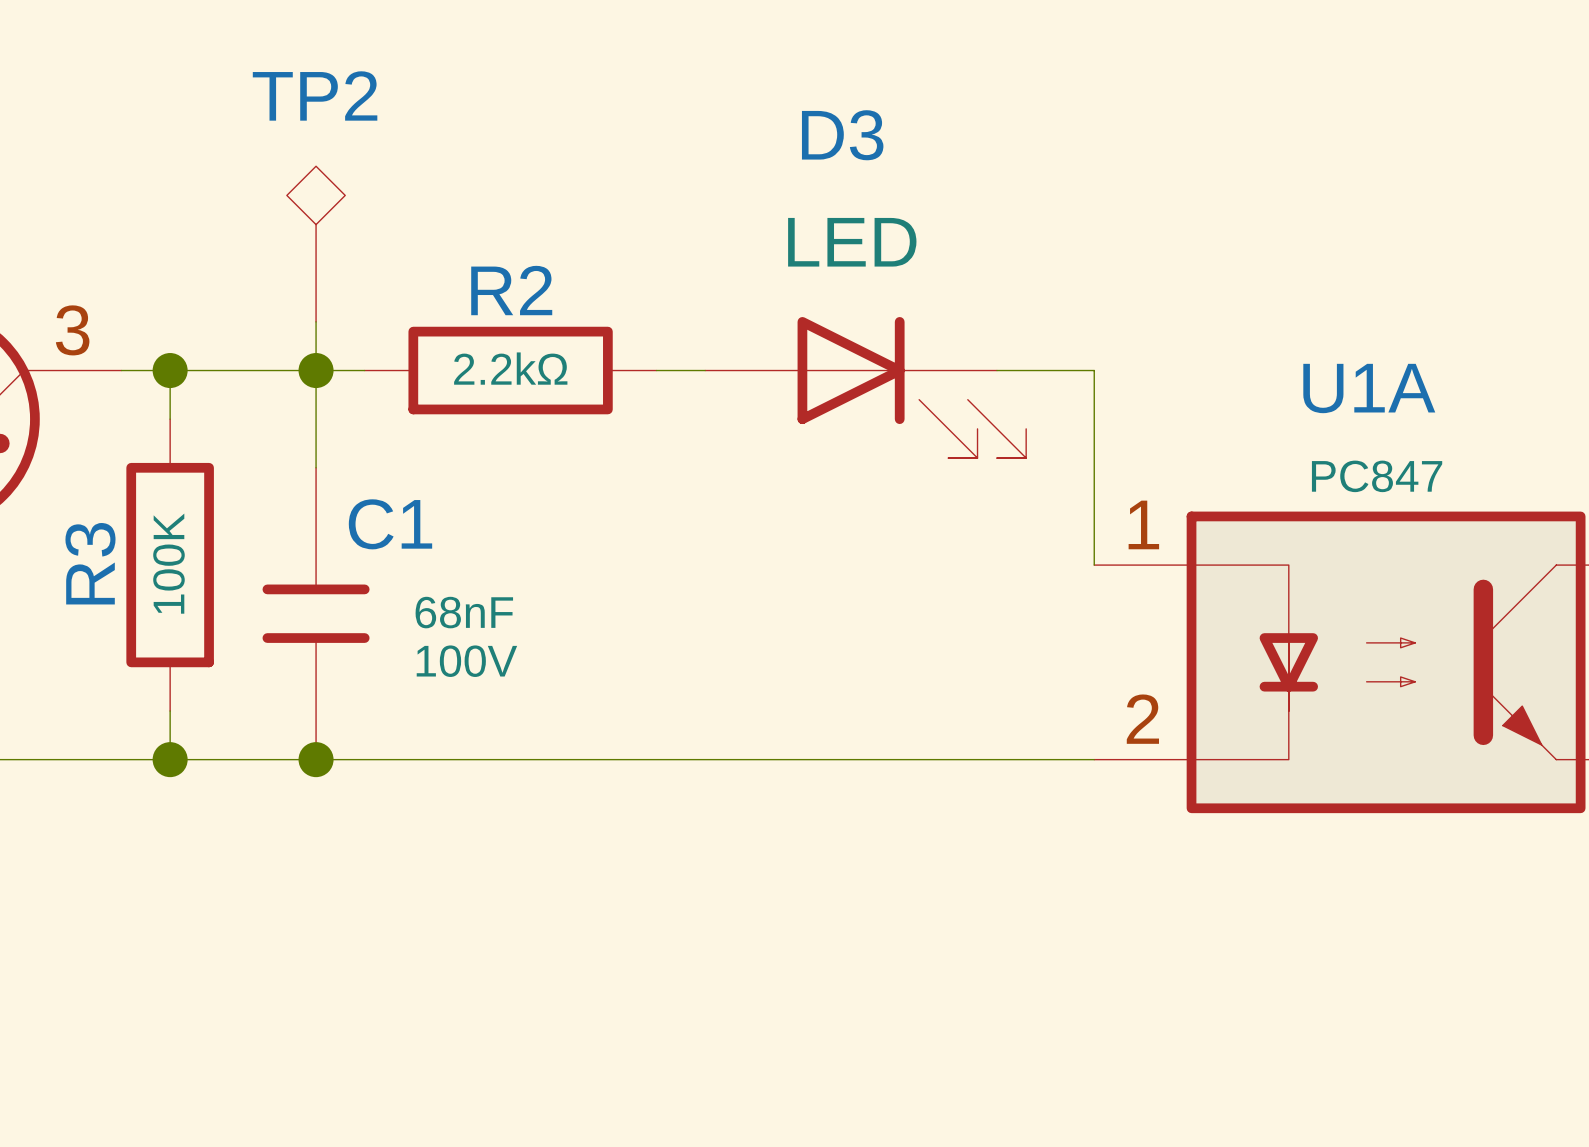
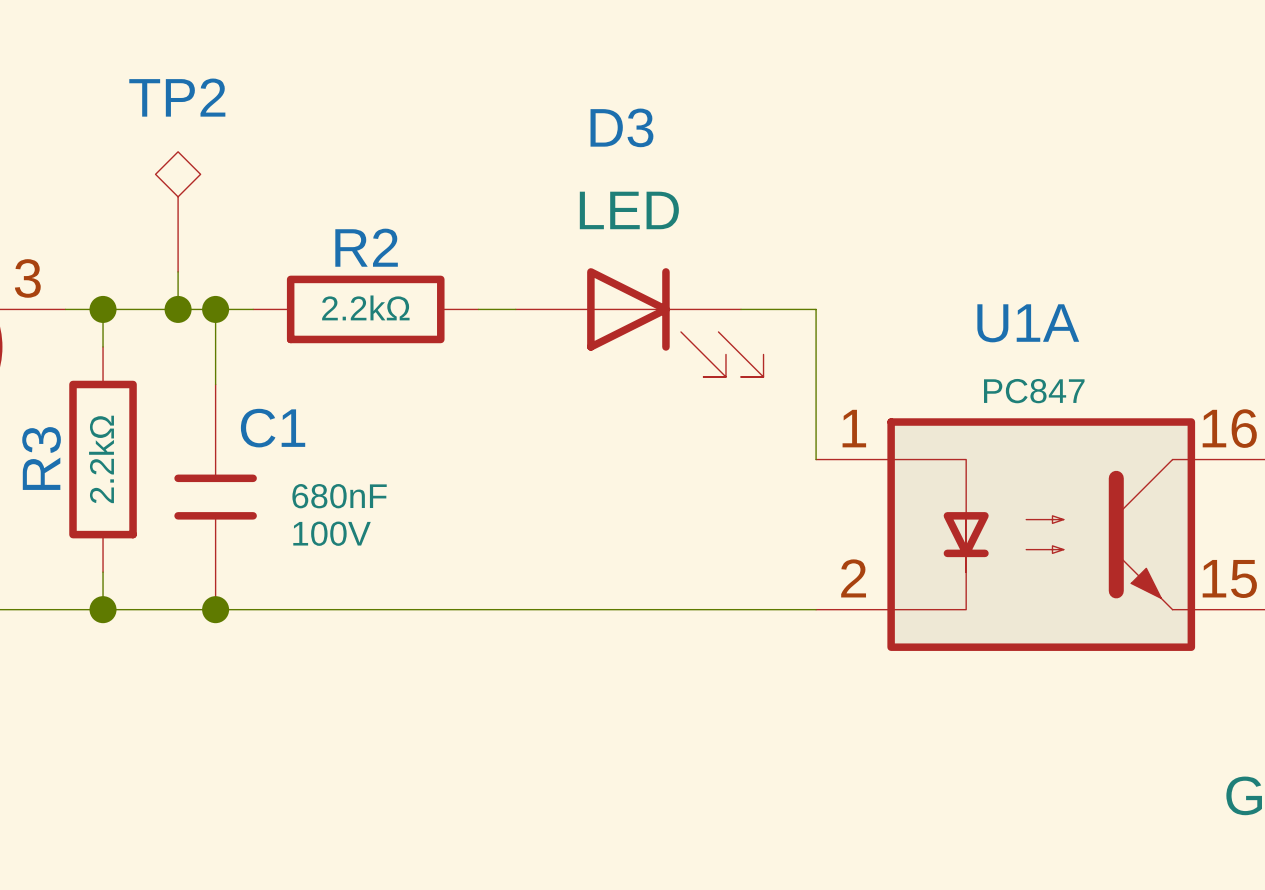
TP2 position: (316, 244) -> (178, 211)
wire: (316, 321) (316, 370) -> (178, 271) (178, 309)
junction: none -> (178, 309)
R3 value: 100K (168, 563) -> 2.2kΩ (101, 459)
C1 value: 68nF (464, 612) -> 680nF (339, 496)

